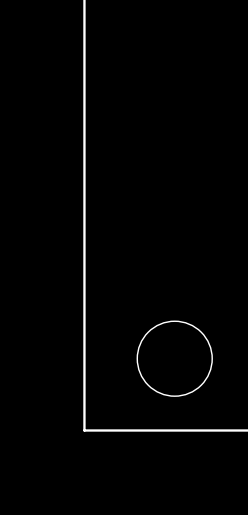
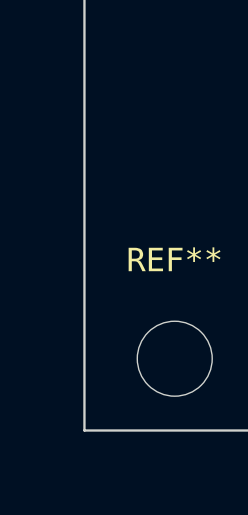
REF** name: none -> REF** (174, 259)

